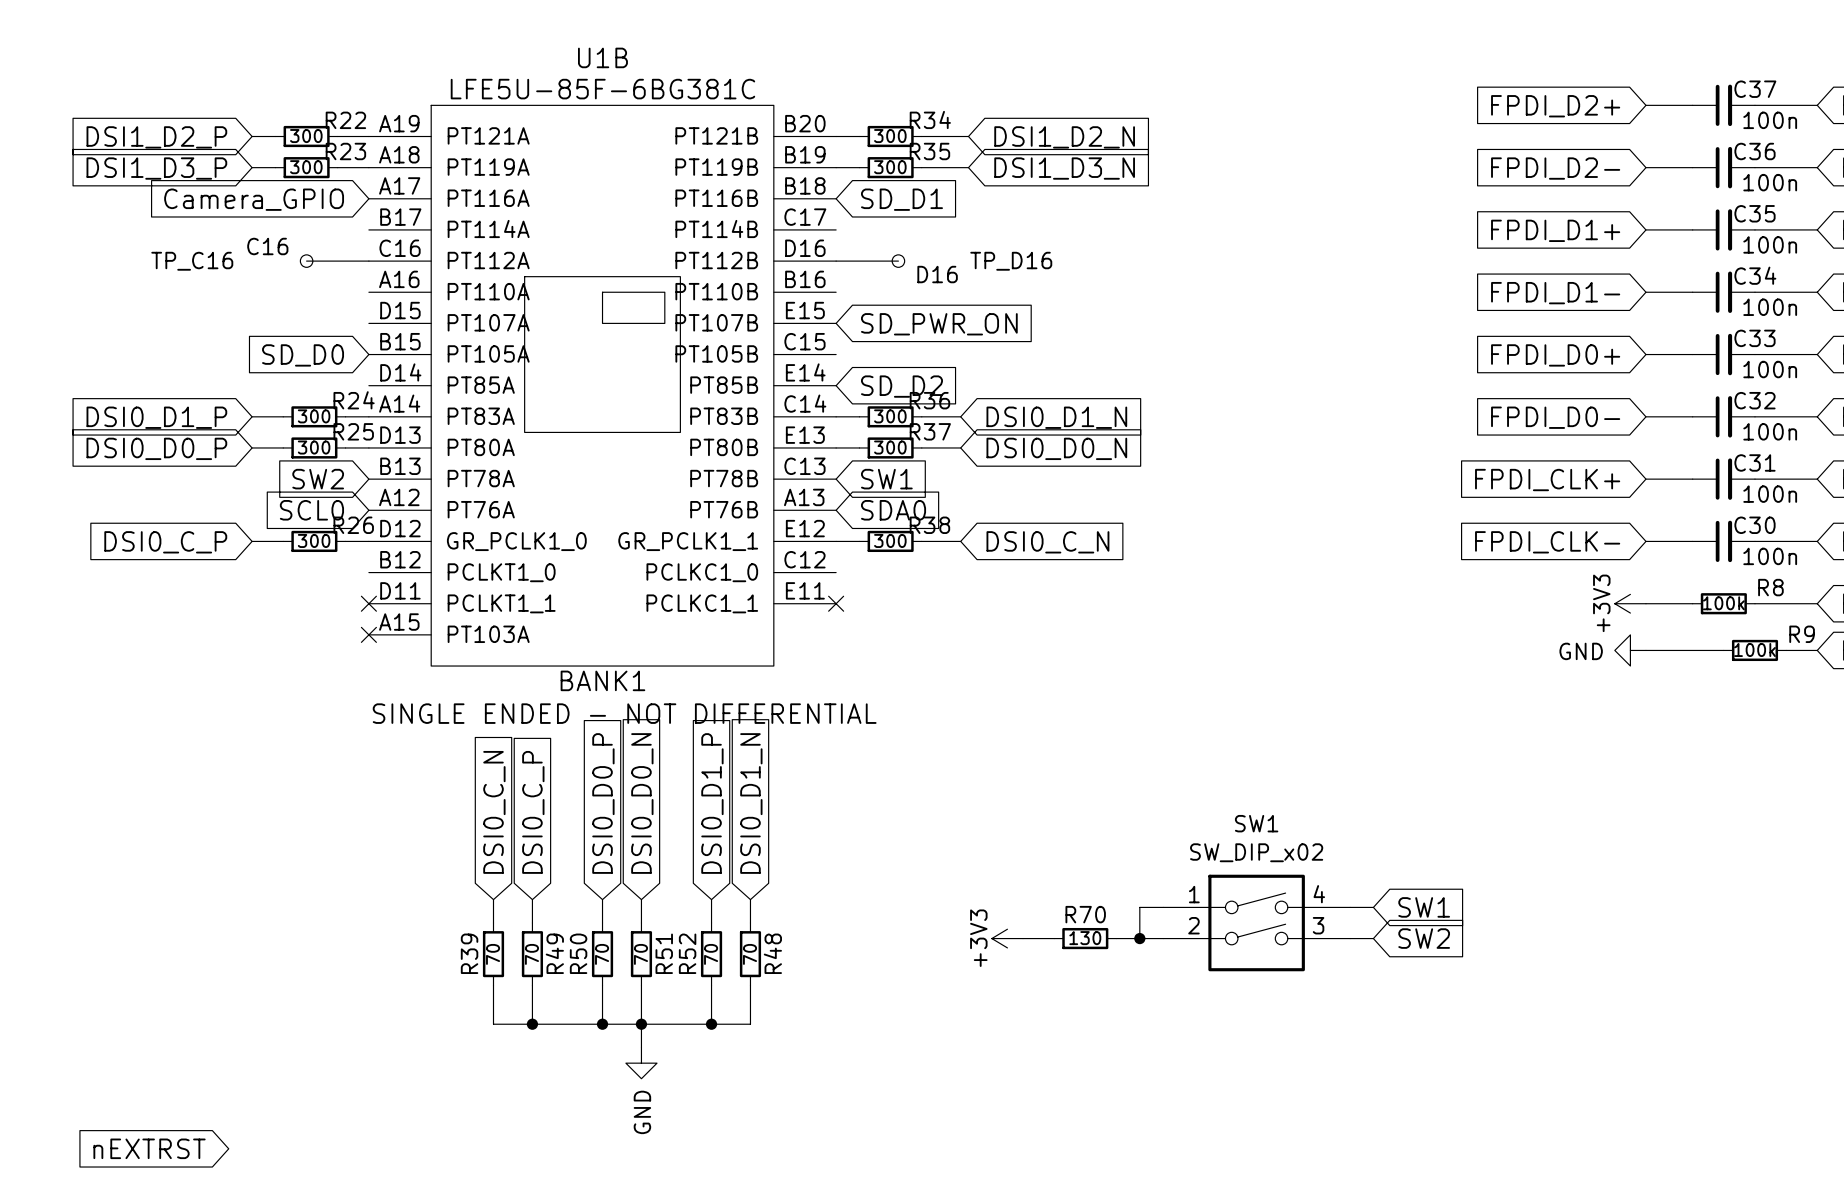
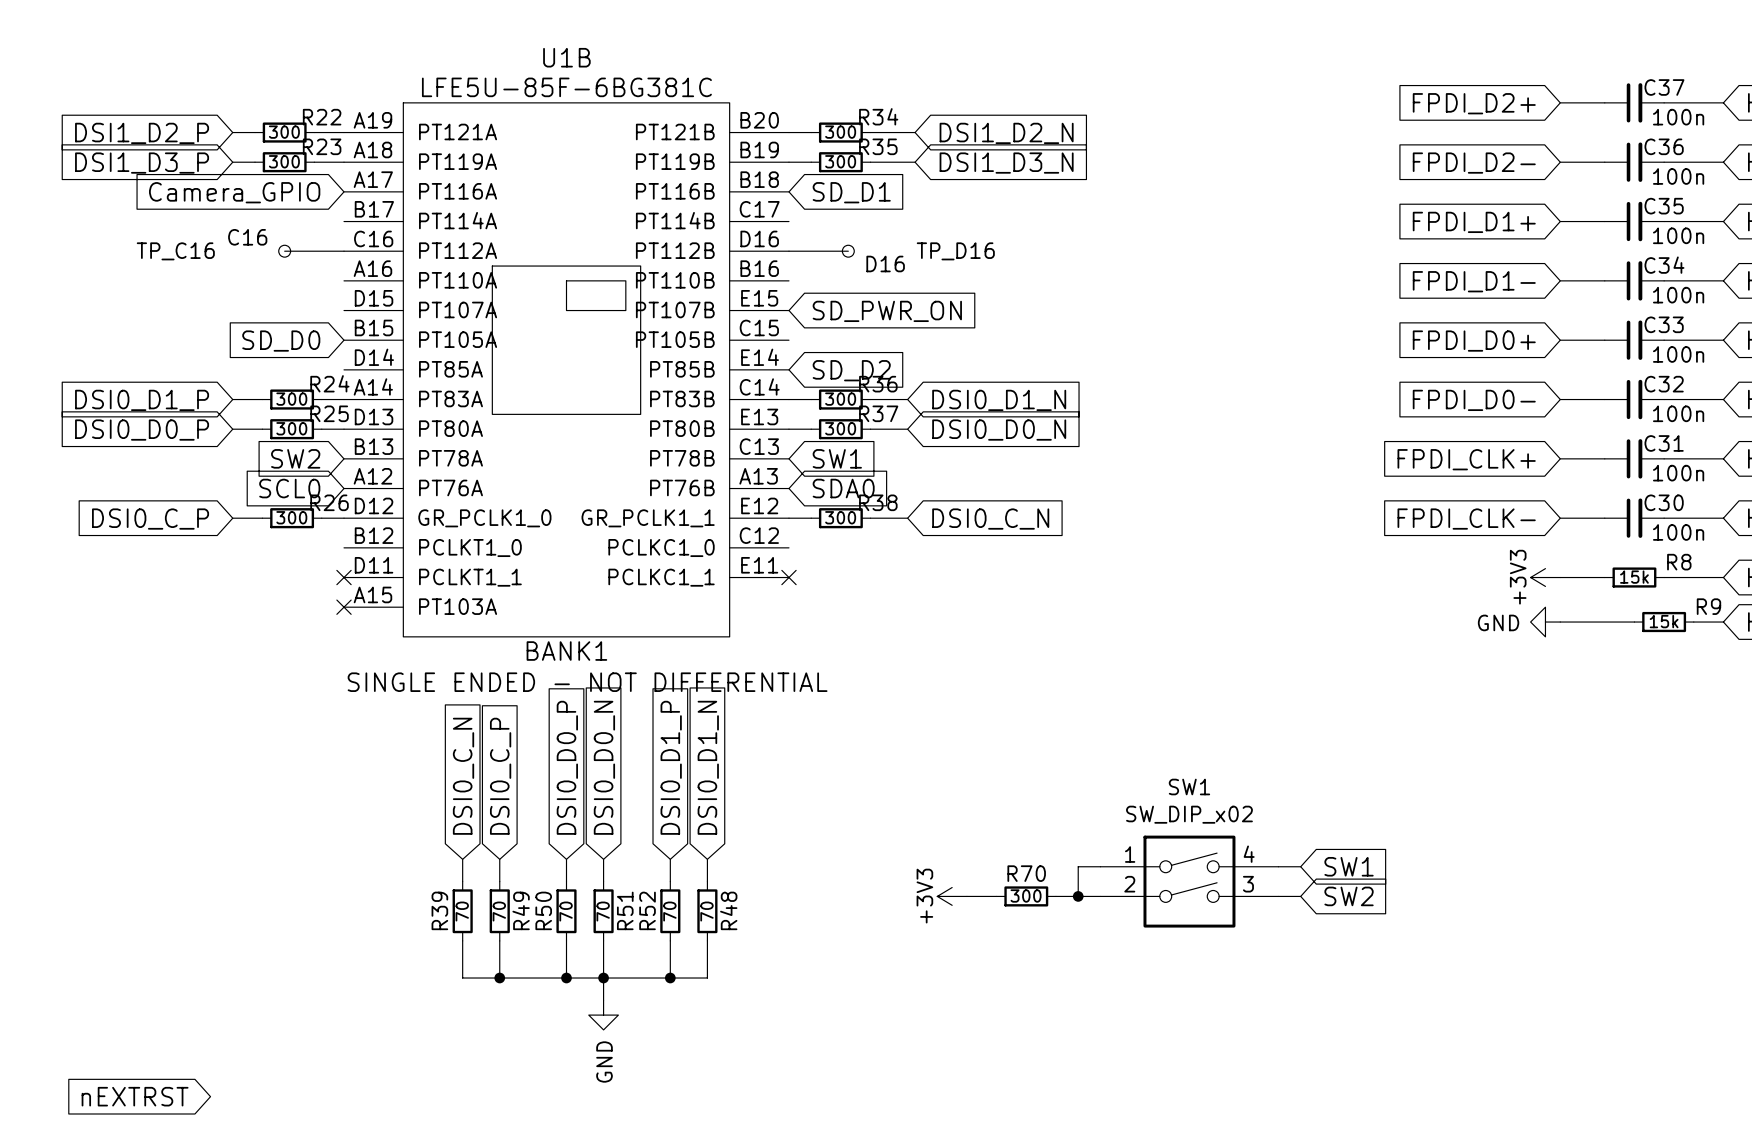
R8 value: 100k (1723, 603) -> 15k (1634, 577)
R9 value: 100k (1754, 649) -> 15k (1664, 621)
R70 value: 130 (1085, 938) -> 300 (1026, 895)

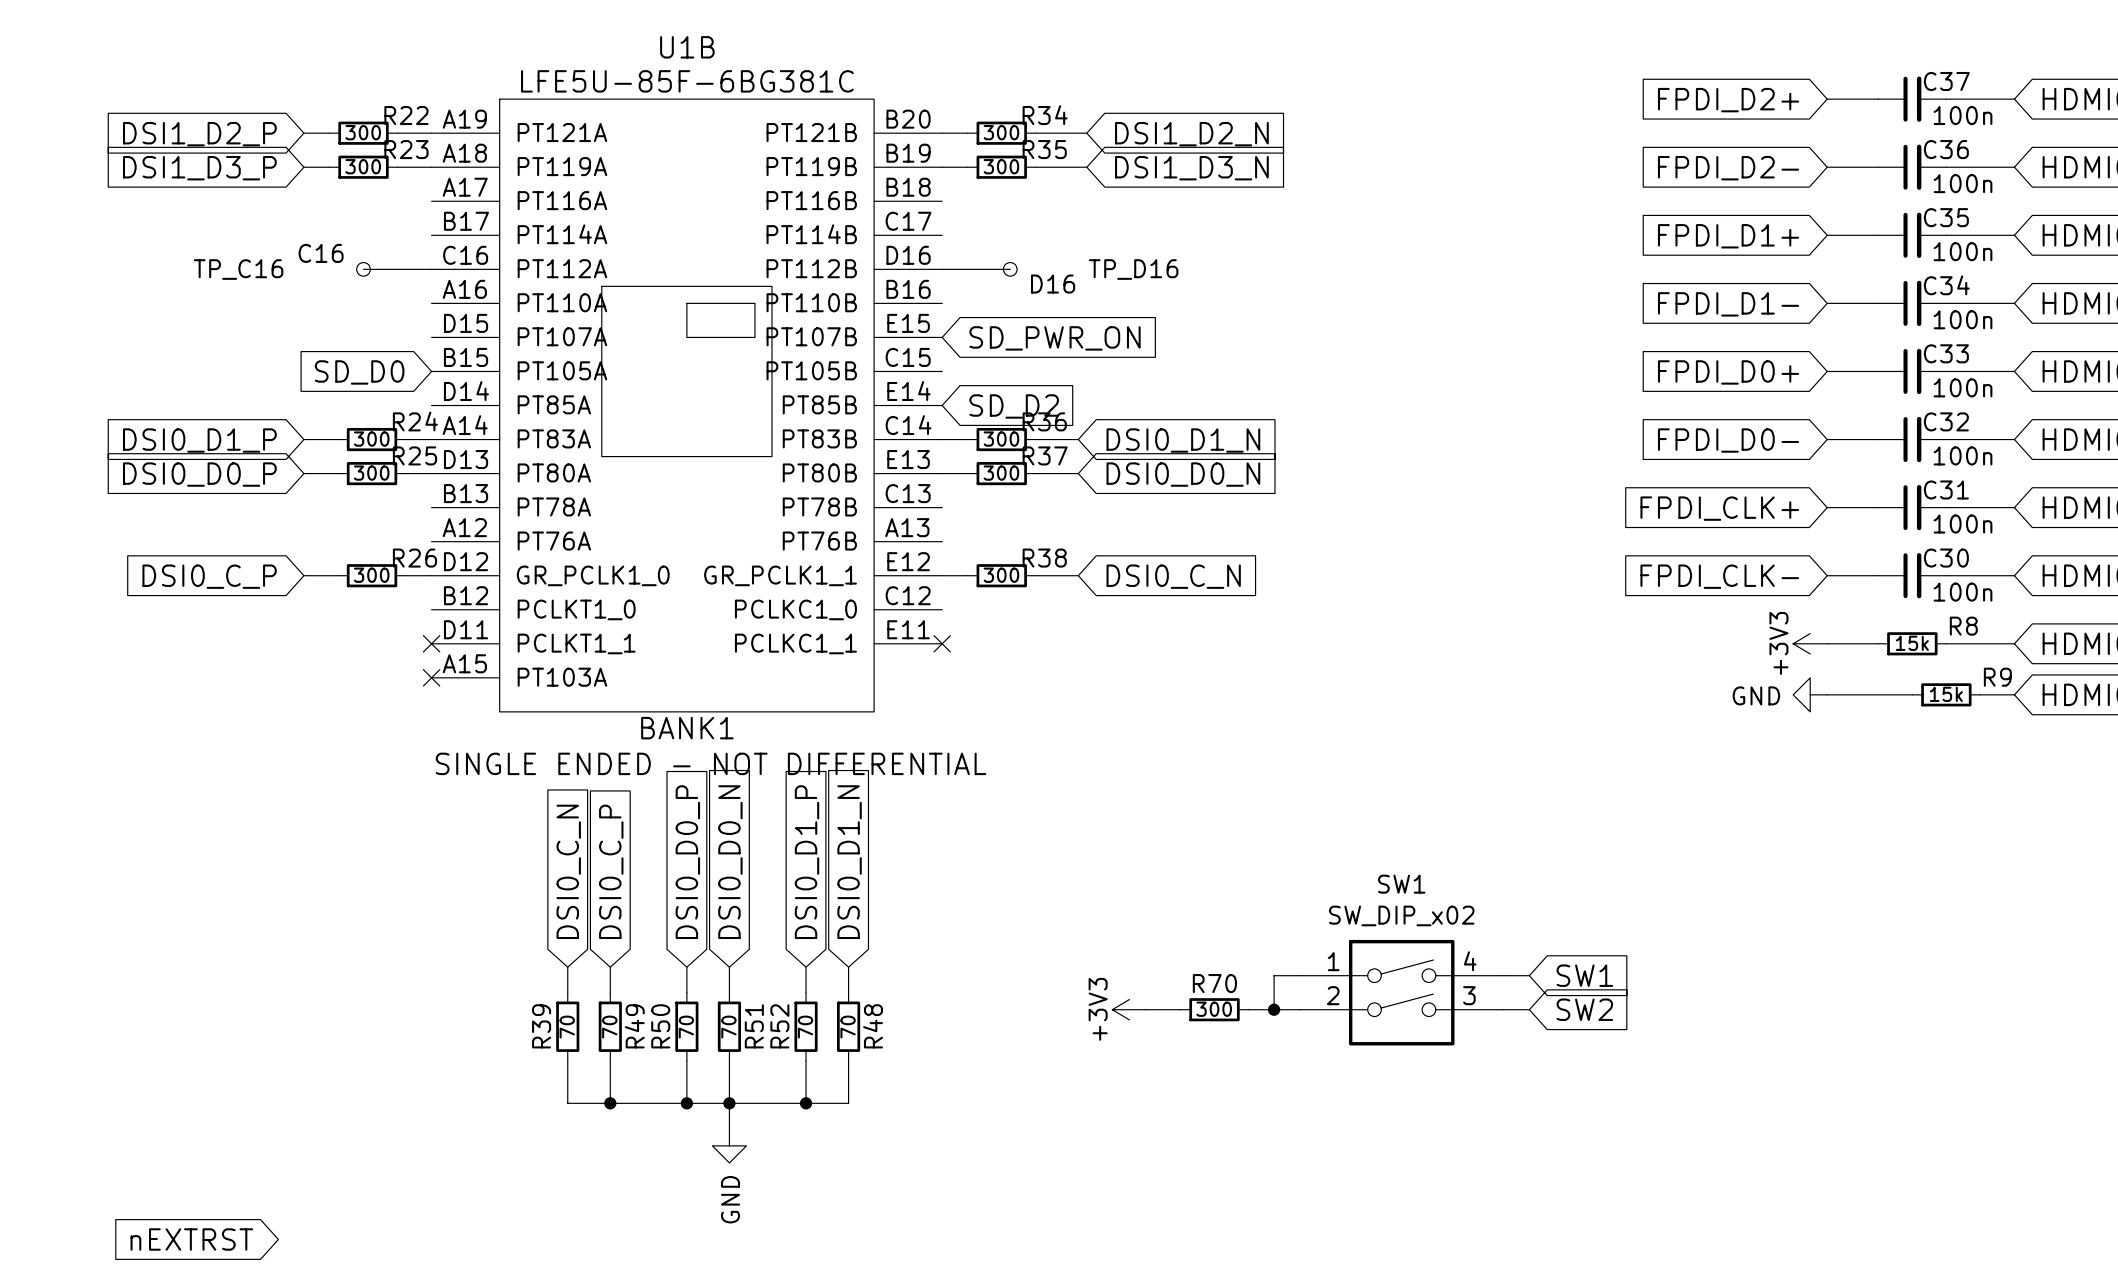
global label: Camera_GPIO (234, 192) -> none
global label: SD_D1 (851, 192) -> none
global label: SW2 (295, 458) -> none
global label: SW1 (837, 458) -> none
global label: SCL0 (289, 488) -> none
global label: SDA0 (843, 488) -> none

